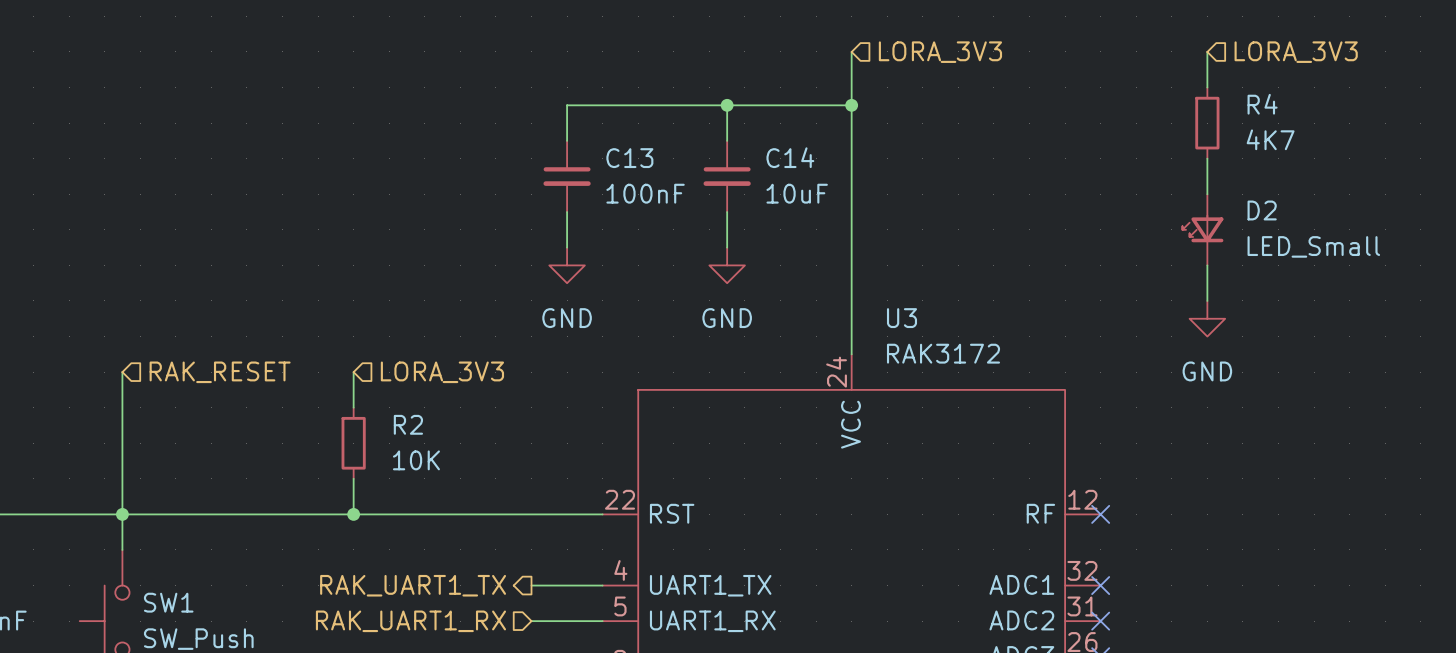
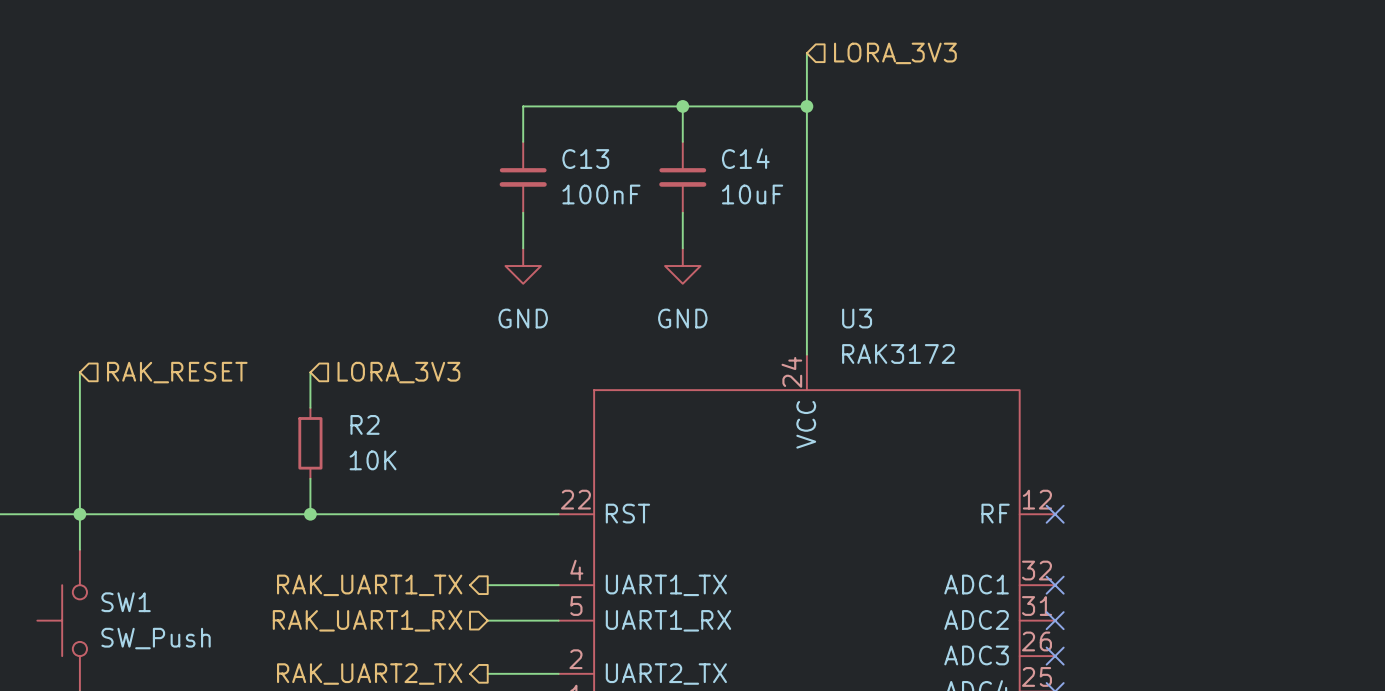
wire: (1207, 51) (1207, 87) -> none
hierarchical label: LORA_3V3 (1296, 52) -> none
R4: 4K7 (1207, 123) -> none
wire: (1207, 158) (1207, 194) -> none
D2: LED_Small (1202, 229) -> none
wire: (1207, 265) (1207, 300) -> none
power symbol: GND (1207, 318) -> none

